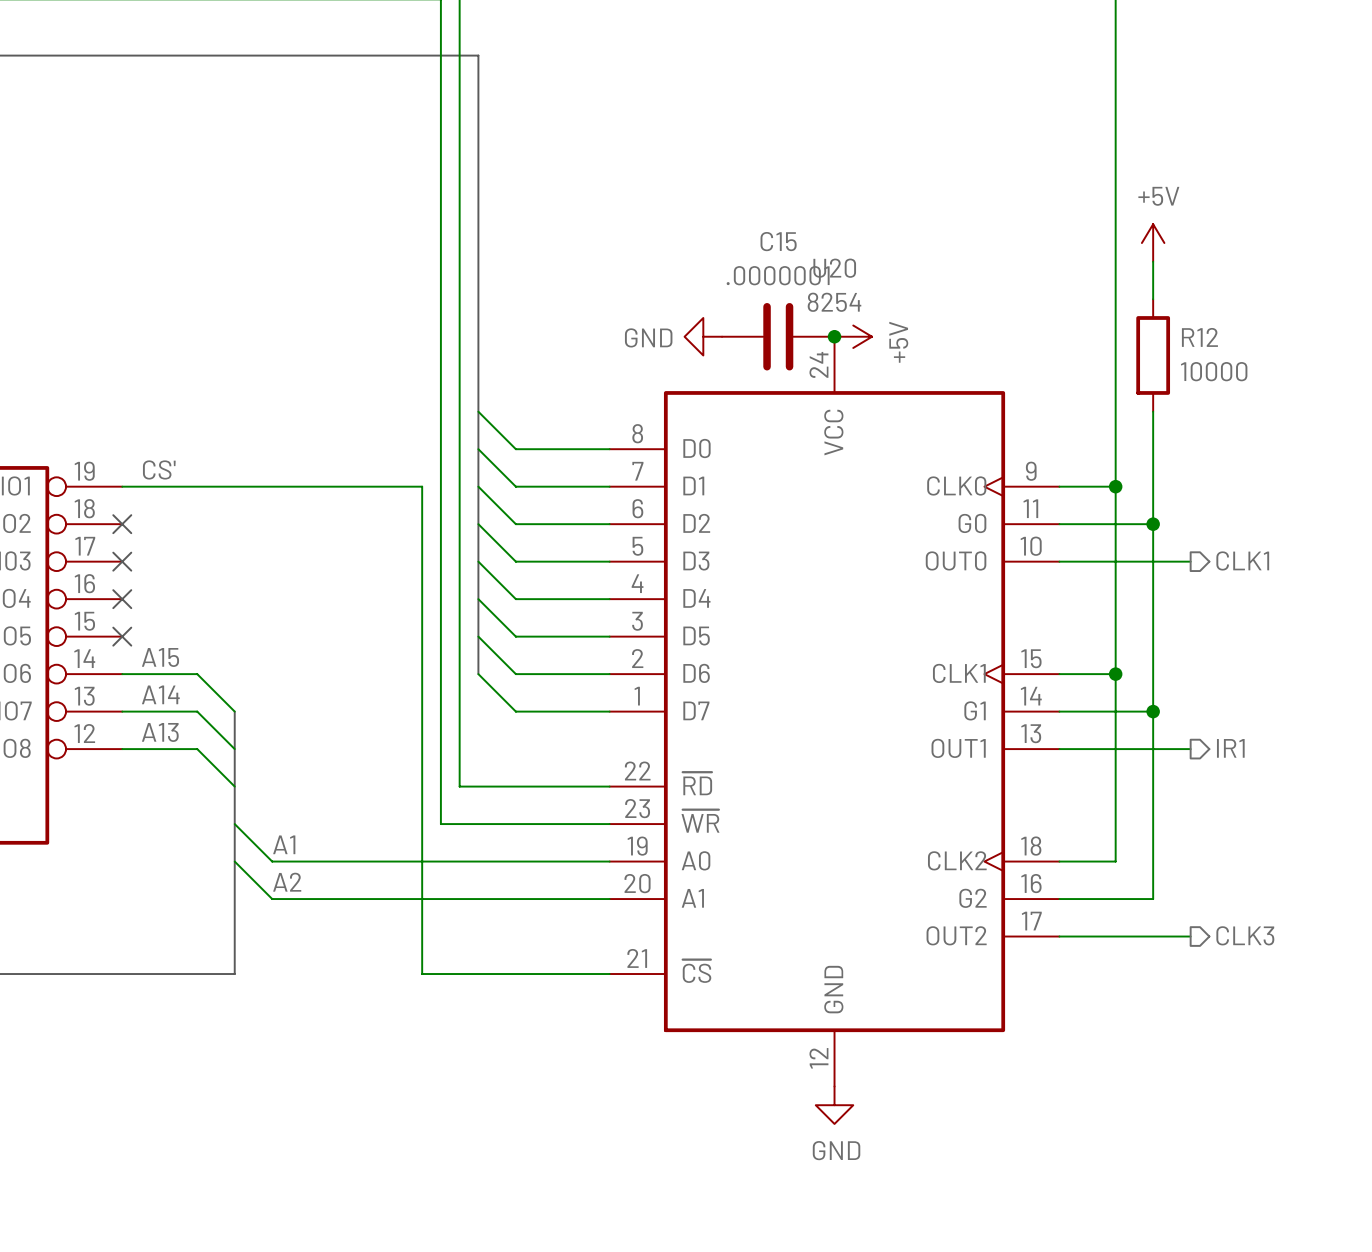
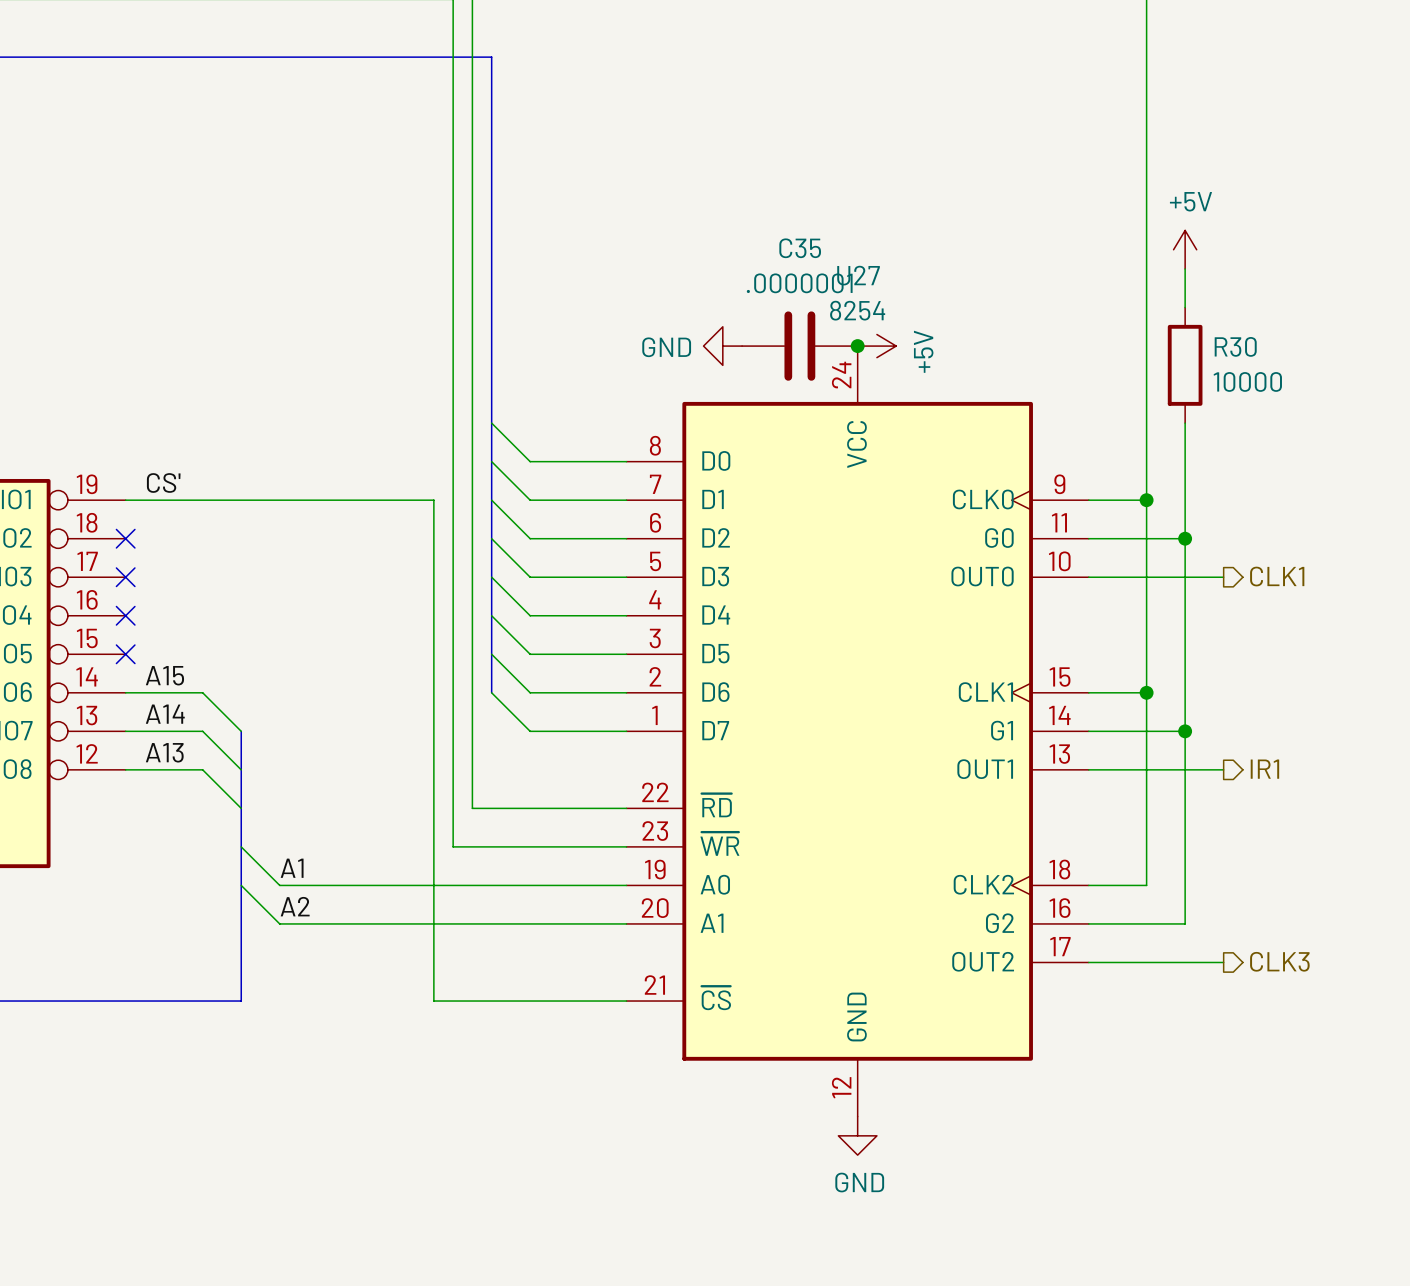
C15 name: C15 (778, 241) -> C35 (800, 248)
U20 name: U20 (834, 268) -> U27 (858, 275)
R12 name: R12 (1199, 337) -> R30 (1235, 346)

